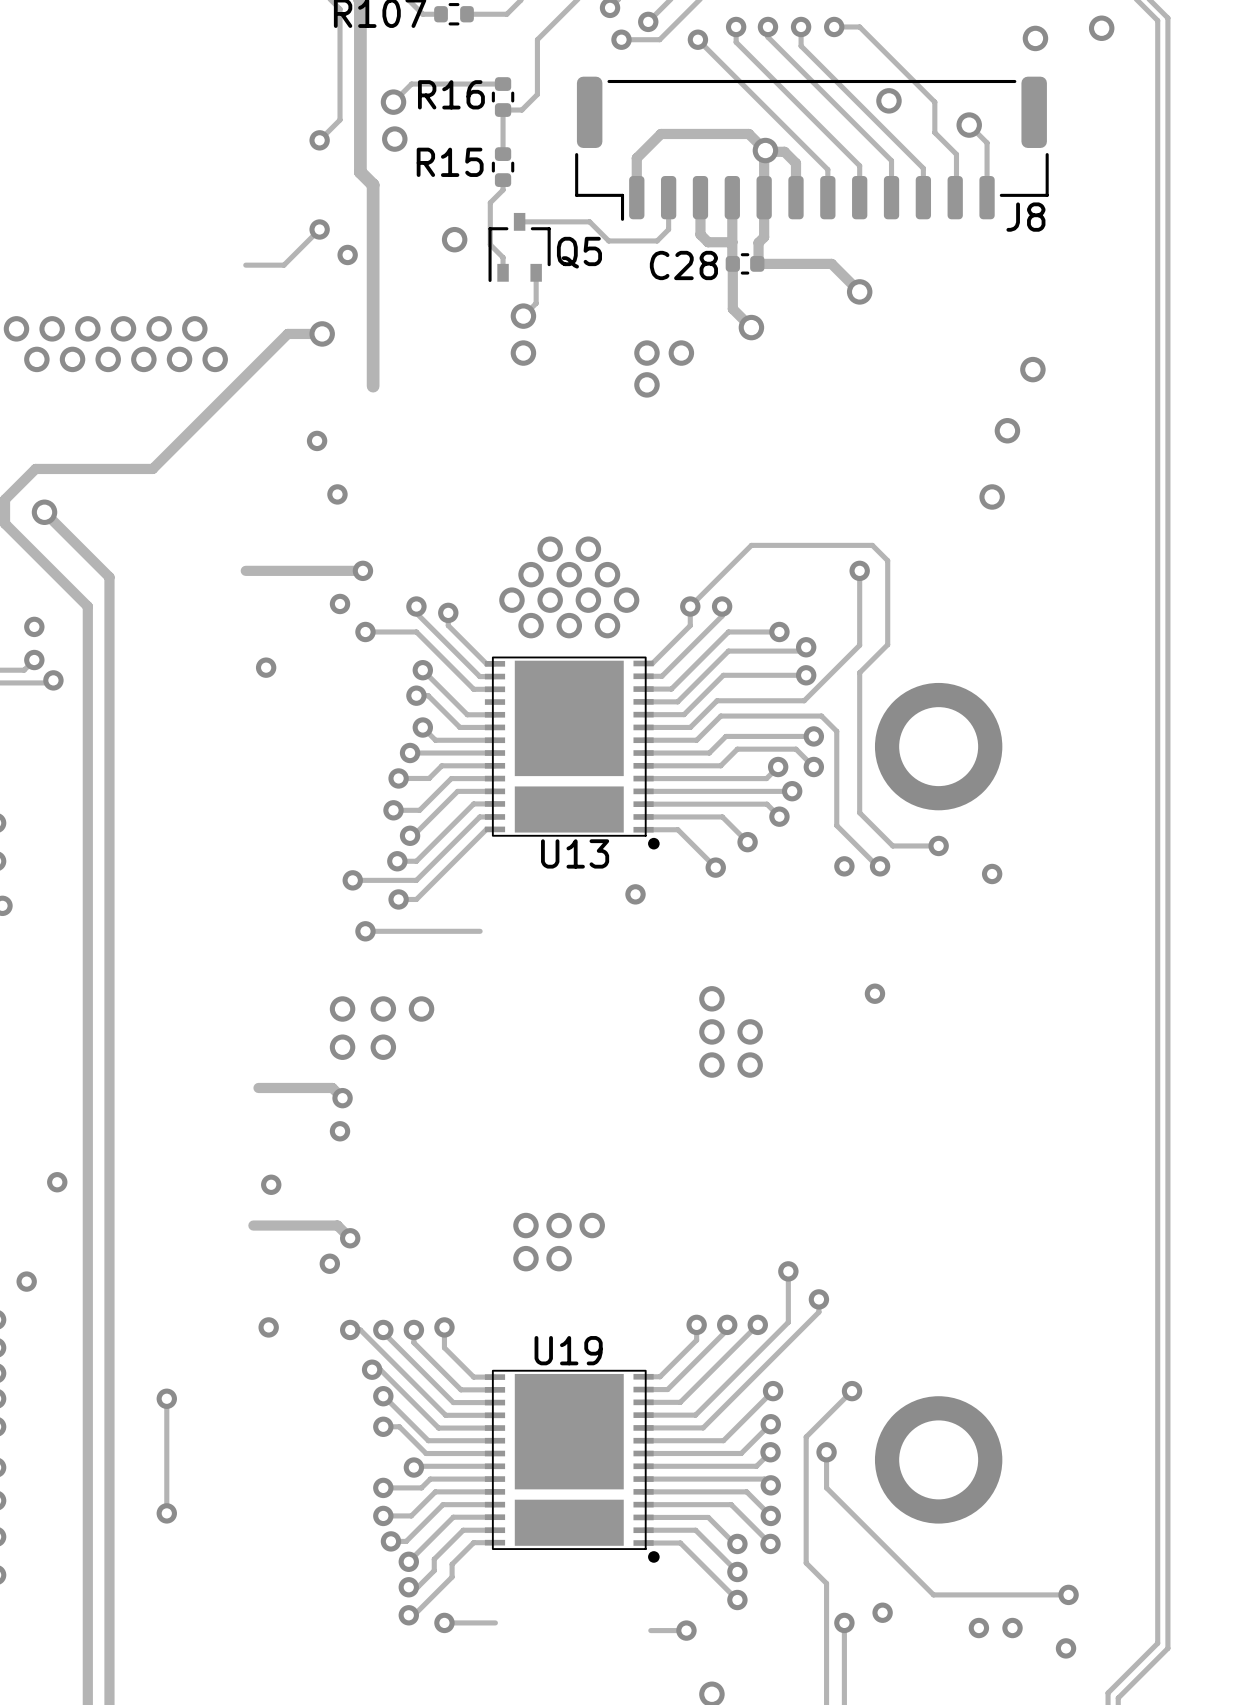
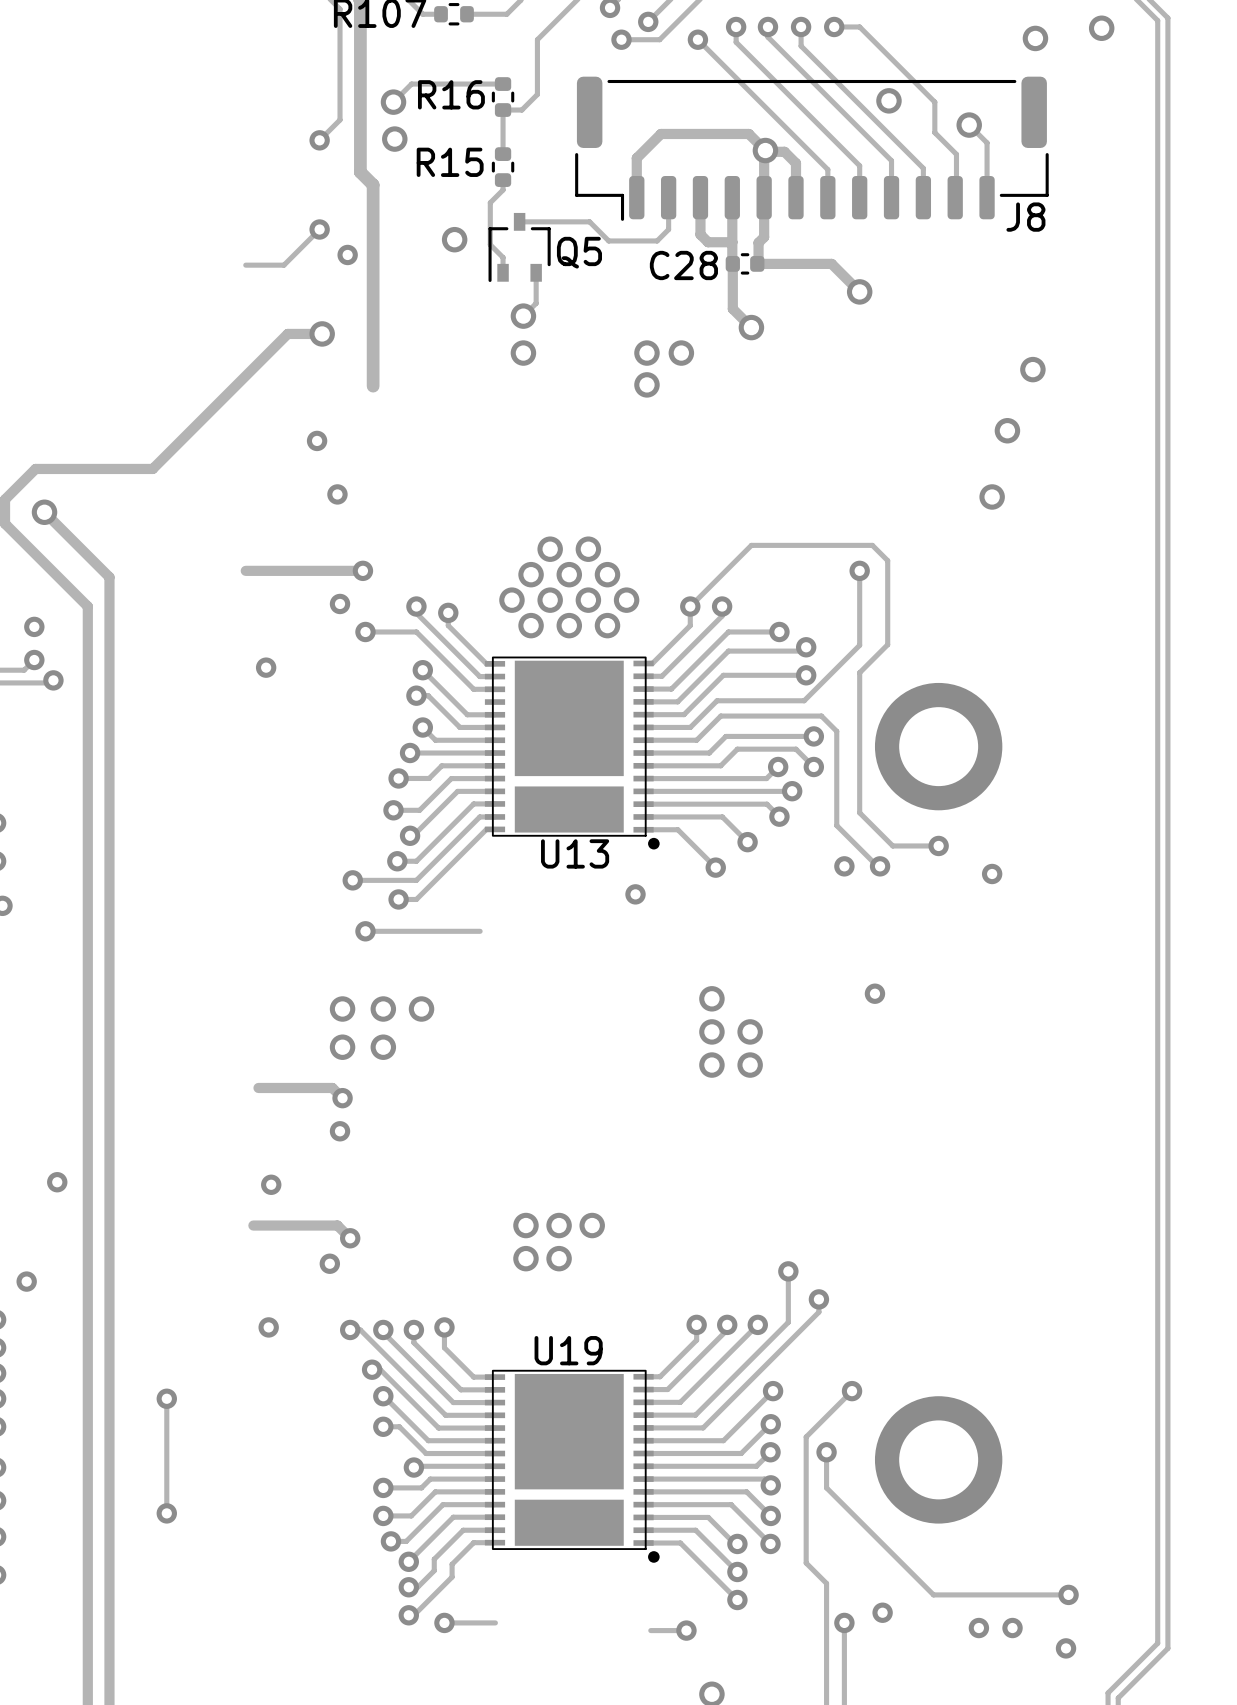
via: (16, 328) -> none
via: (52, 328) -> none
via: (87, 328) -> none
via: (123, 328) -> none
via: (159, 328) -> none
via: (194, 328) -> none
via: (36, 359) -> none
via: (72, 359) -> none
via: (108, 359) -> none
via: (143, 359) -> none
via: (179, 359) -> none
via: (215, 359) -> none

